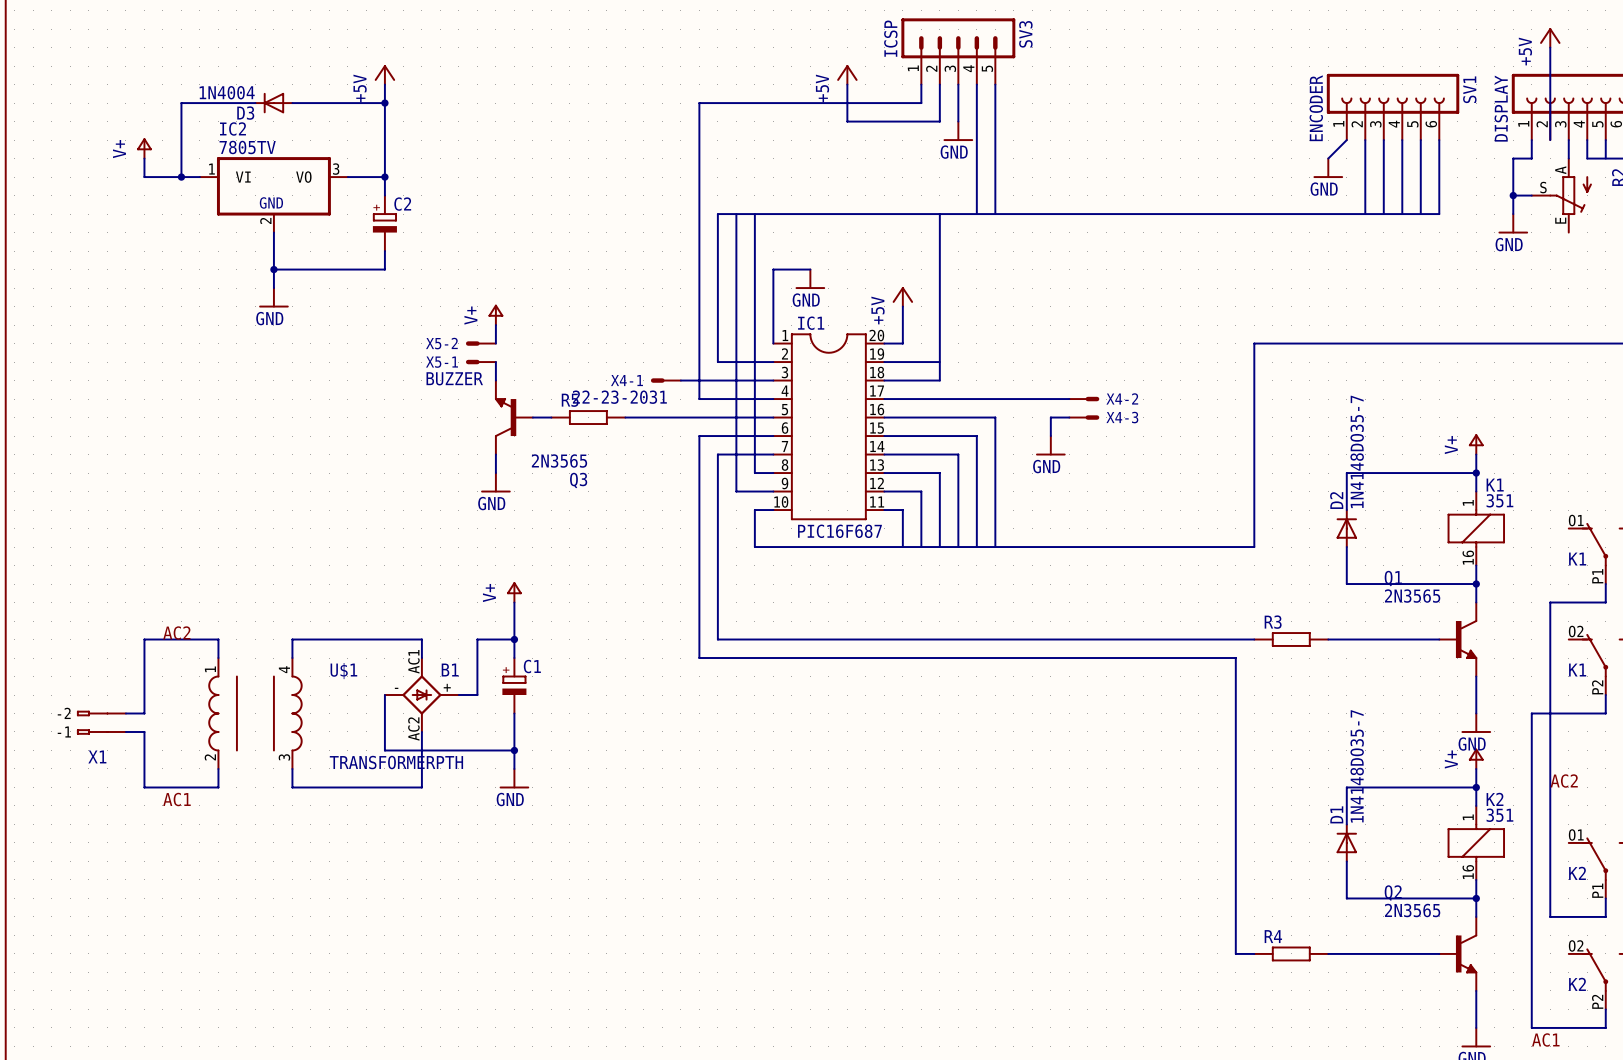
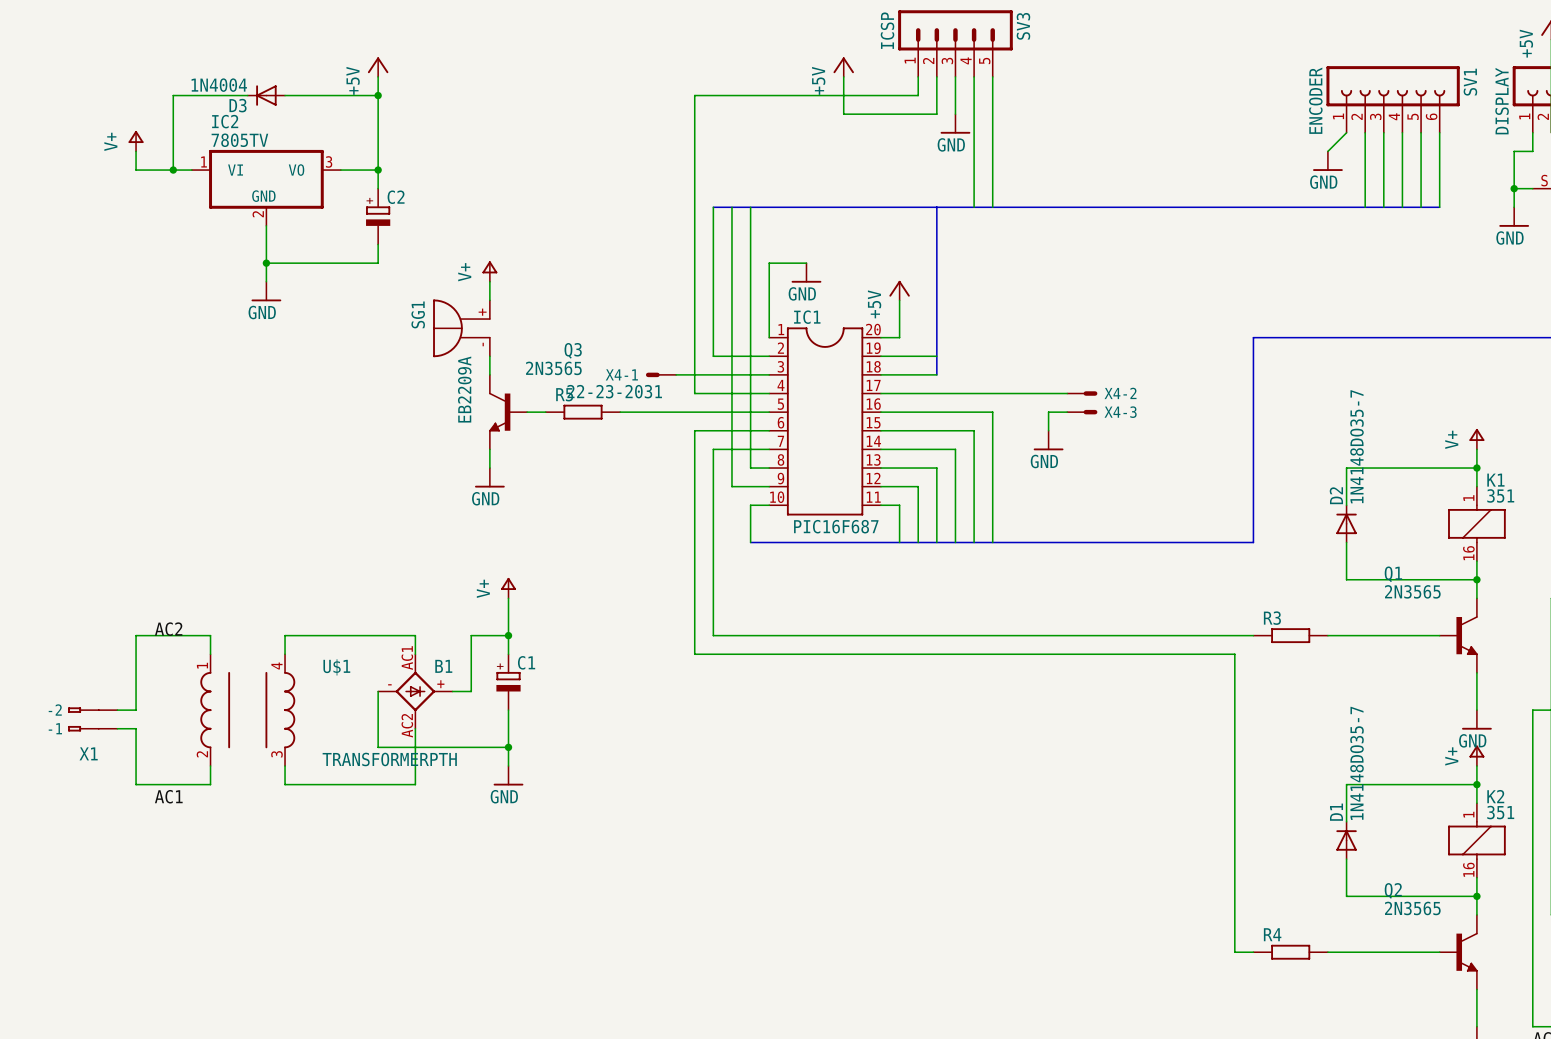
power symbol position: V+ (495, 314) -> V+ (489, 271)
wire: (495, 325) (495, 343) -> (489, 281) (489, 300)
SG1: none -> EB2209A (461, 328)
X5-2: (480, 343) -> none
X5-1: BUZZER (480, 362) -> none
Q3 flip: as is (505, 417) -> up-down (499, 412)

